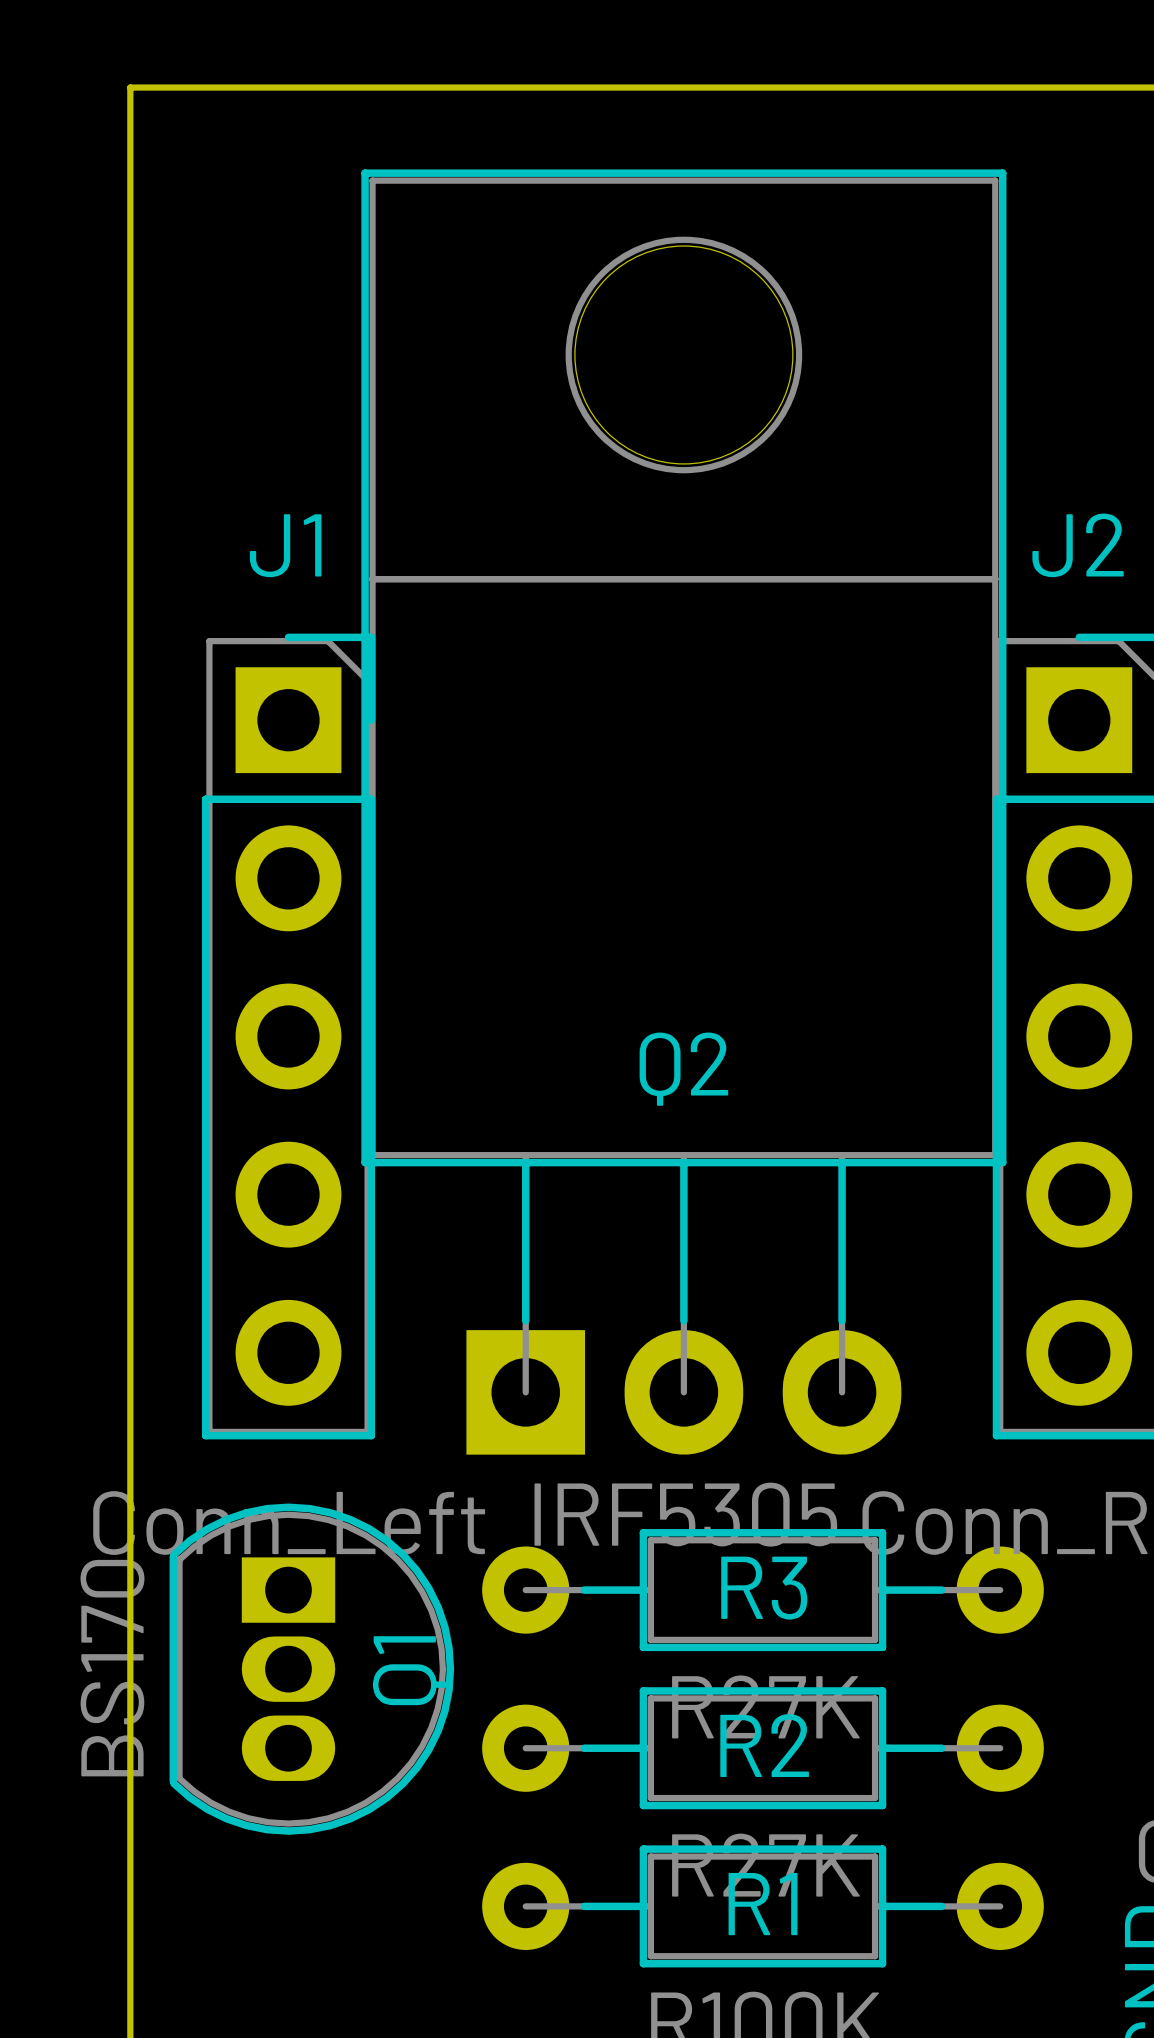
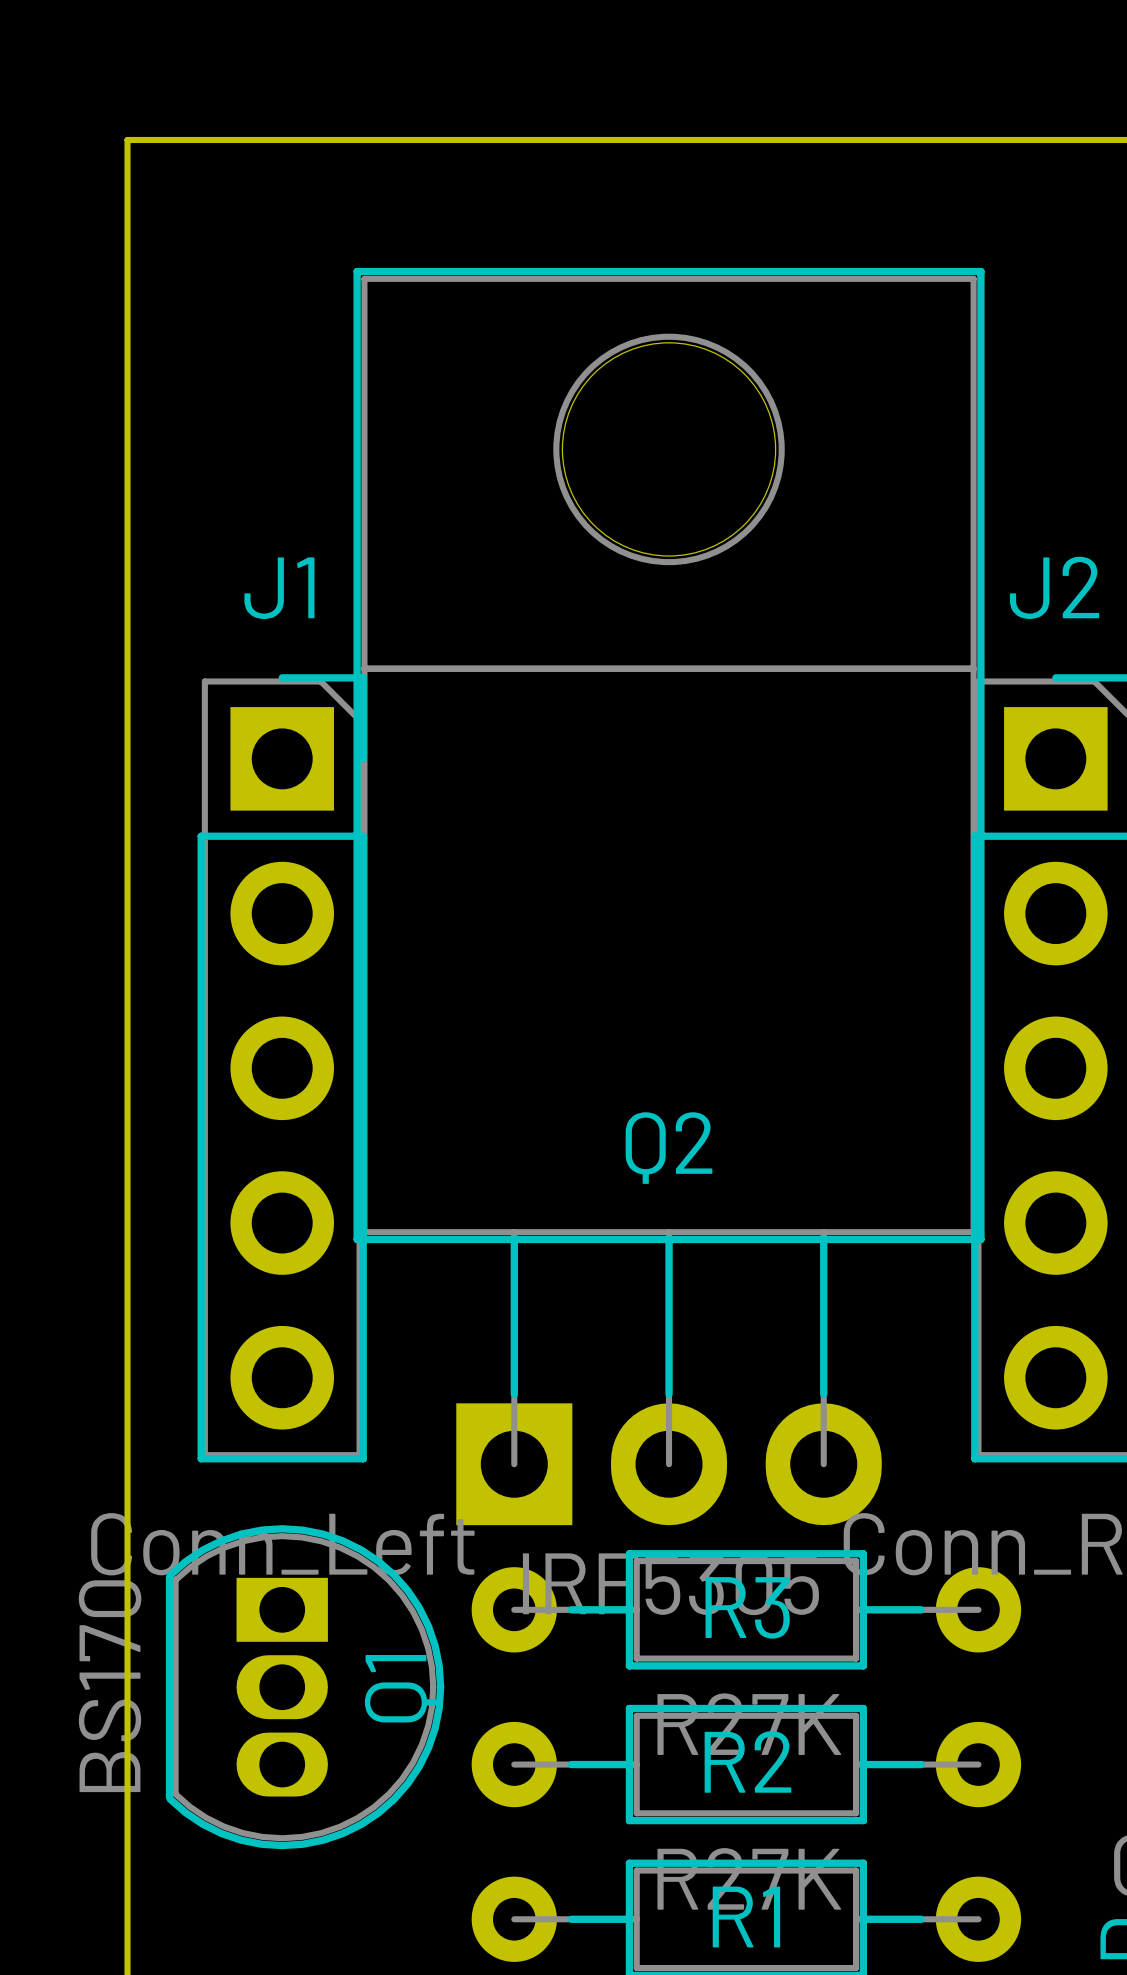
Q2 position: (683, 812) -> (669, 896)

